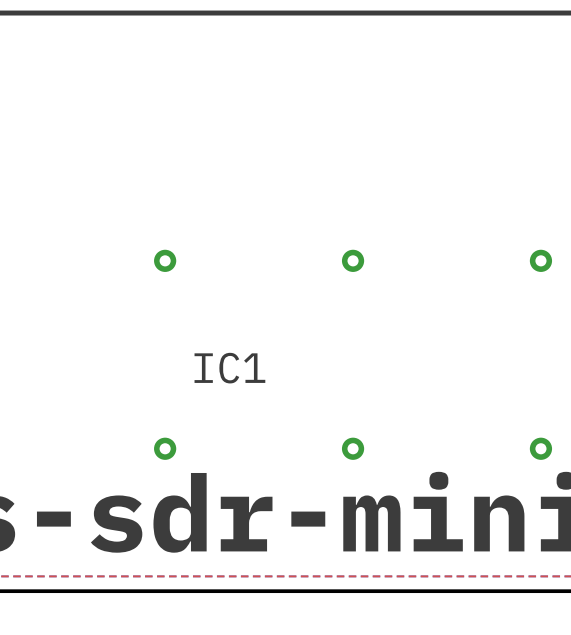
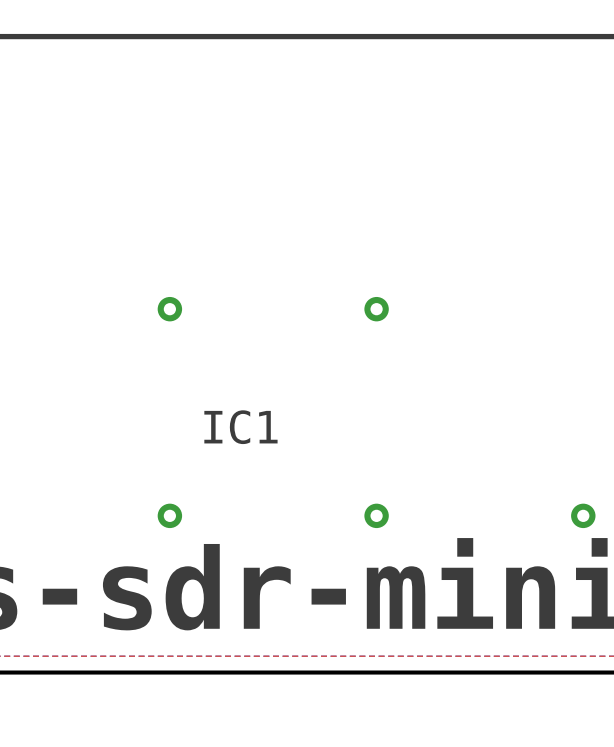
via: (540, 260) -> none

